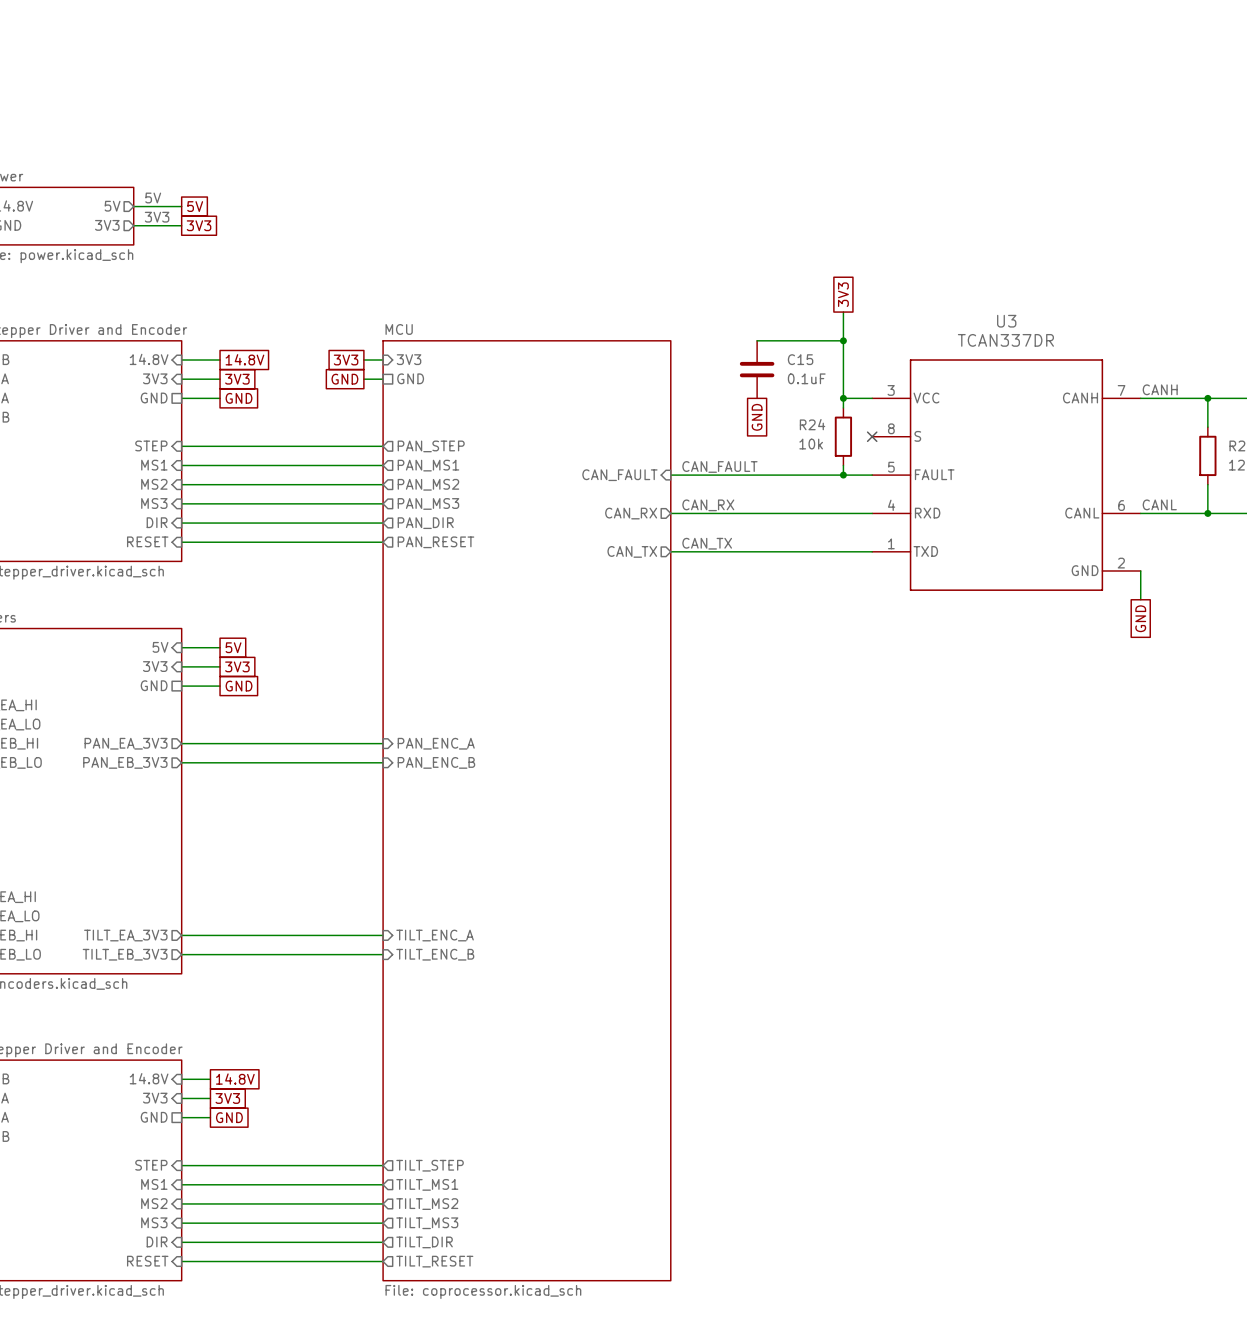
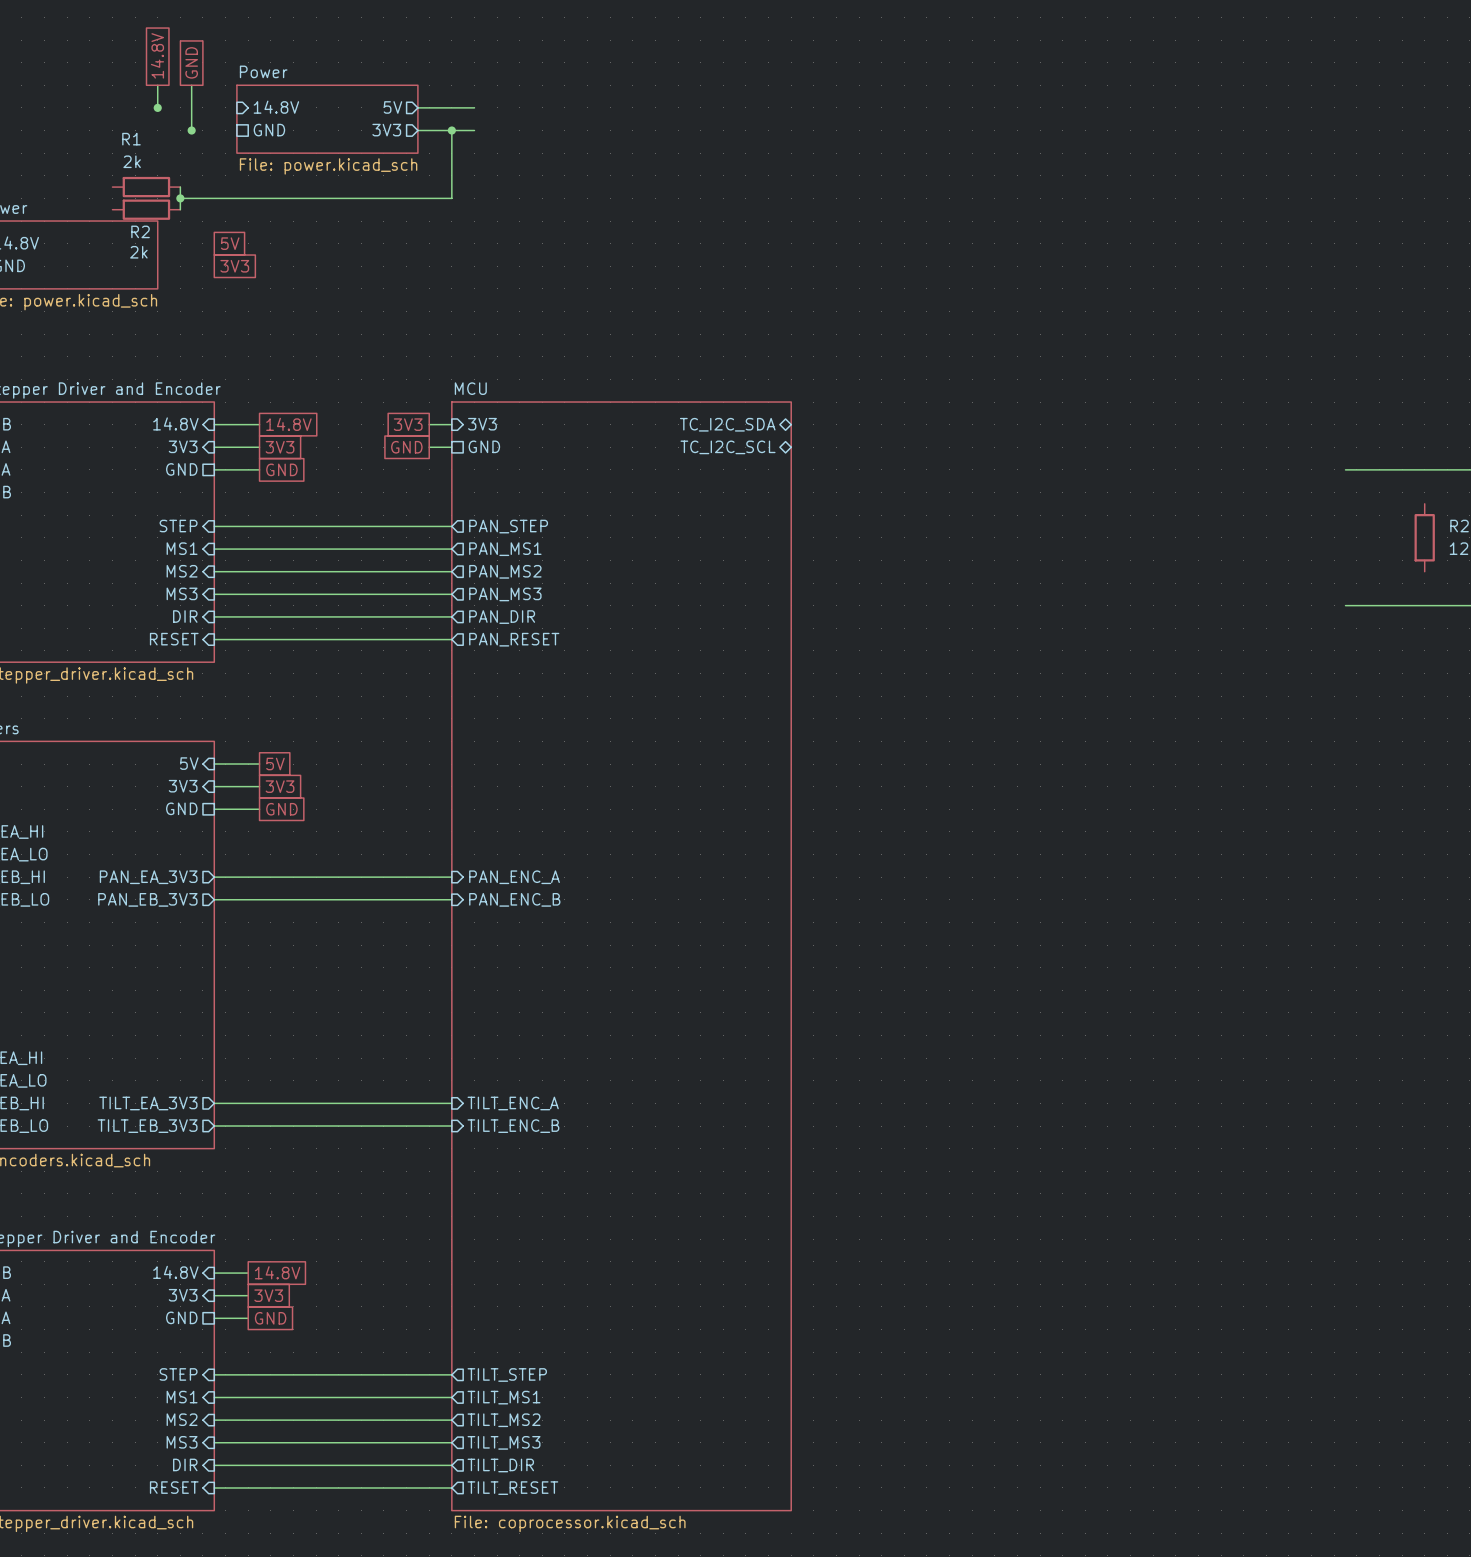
global label: none -> 14.8V (157, 55)
global label: none -> GND (191, 62)
wire: none -> (157, 85) (157, 107)
wire: none -> (191, 85) (191, 130)
sheet pin: none -> 14.8V (276, 107)
junction: none -> (157, 107)
sheet pin: none -> 5V (392, 107)
wire: none -> (417, 107) (474, 107)
sheet Power: none -> File: power.kicad_sch (327, 119)
junction: none -> (191, 130)
sheet pin: none -> GND (269, 130)
sheet pin: none -> 3V3 (386, 130)
wire: none -> (417, 130) (474, 130)
wire: none -> (451, 130) (451, 198) (180, 198)
junction: none -> (451, 130)
R1: none -> 2k (146, 187)
wire: none -> (180, 187) (180, 209)
junction: none -> (180, 198)
R2: none -> 2k (146, 209)
label: 5V (153, 197) -> none
sheet pin: 5V (112, 206) -> none
wire: (133, 206) (181, 206) -> none
label: 3V3 (157, 217) -> none
sheet pin: 3V3 (107, 225) -> none
wire: (133, 225) (181, 225) -> none
global label: 3V3 (843, 294) -> none
wire: (843, 312) (843, 407) -> none
wire: (757, 340) (843, 340) -> none
junction: (843, 340) -> none
sheet pin: none -> TC_I2C_SDA (727, 424)
C15: 0.1uF (757, 369) -> none
sheet pin: none -> TC_I2C_SCL (728, 447)
label: CANH (1160, 389) -> none
wire: (843, 398) (872, 398) -> none
junction: (843, 398) -> none
wire: (1207, 398) (1207, 427) -> none
junction: (1207, 398) -> none
global label: GND (757, 417) -> none
R24: 10k (843, 436) -> none
no-connect mark: (872, 436) -> none
wire: (843, 465) (843, 475) -> none
label: CAN_FAULT (719, 466) -> none
sheet pin: CAN_FAULT (619, 475) -> none
wire: (670, 475) (872, 475) -> none
junction: (843, 475) -> none
U3: TCAN337DR (1006, 475) -> none
wire: (1207, 484) (1207, 513) -> none
label: CANL (1159, 504) -> none
label: CAN_RX (708, 505) -> none
sheet pin: CAN_RX (631, 513) -> none
wire: (670, 513) (872, 513) -> none
junction: (1207, 513) -> none
label: CAN_TX (707, 543) -> none
sheet pin: CAN_TX (632, 551) -> none
wire: (670, 551) (872, 551) -> none
wire: (1140, 570) (1140, 599) -> none
global label: GND (1140, 618) -> none

